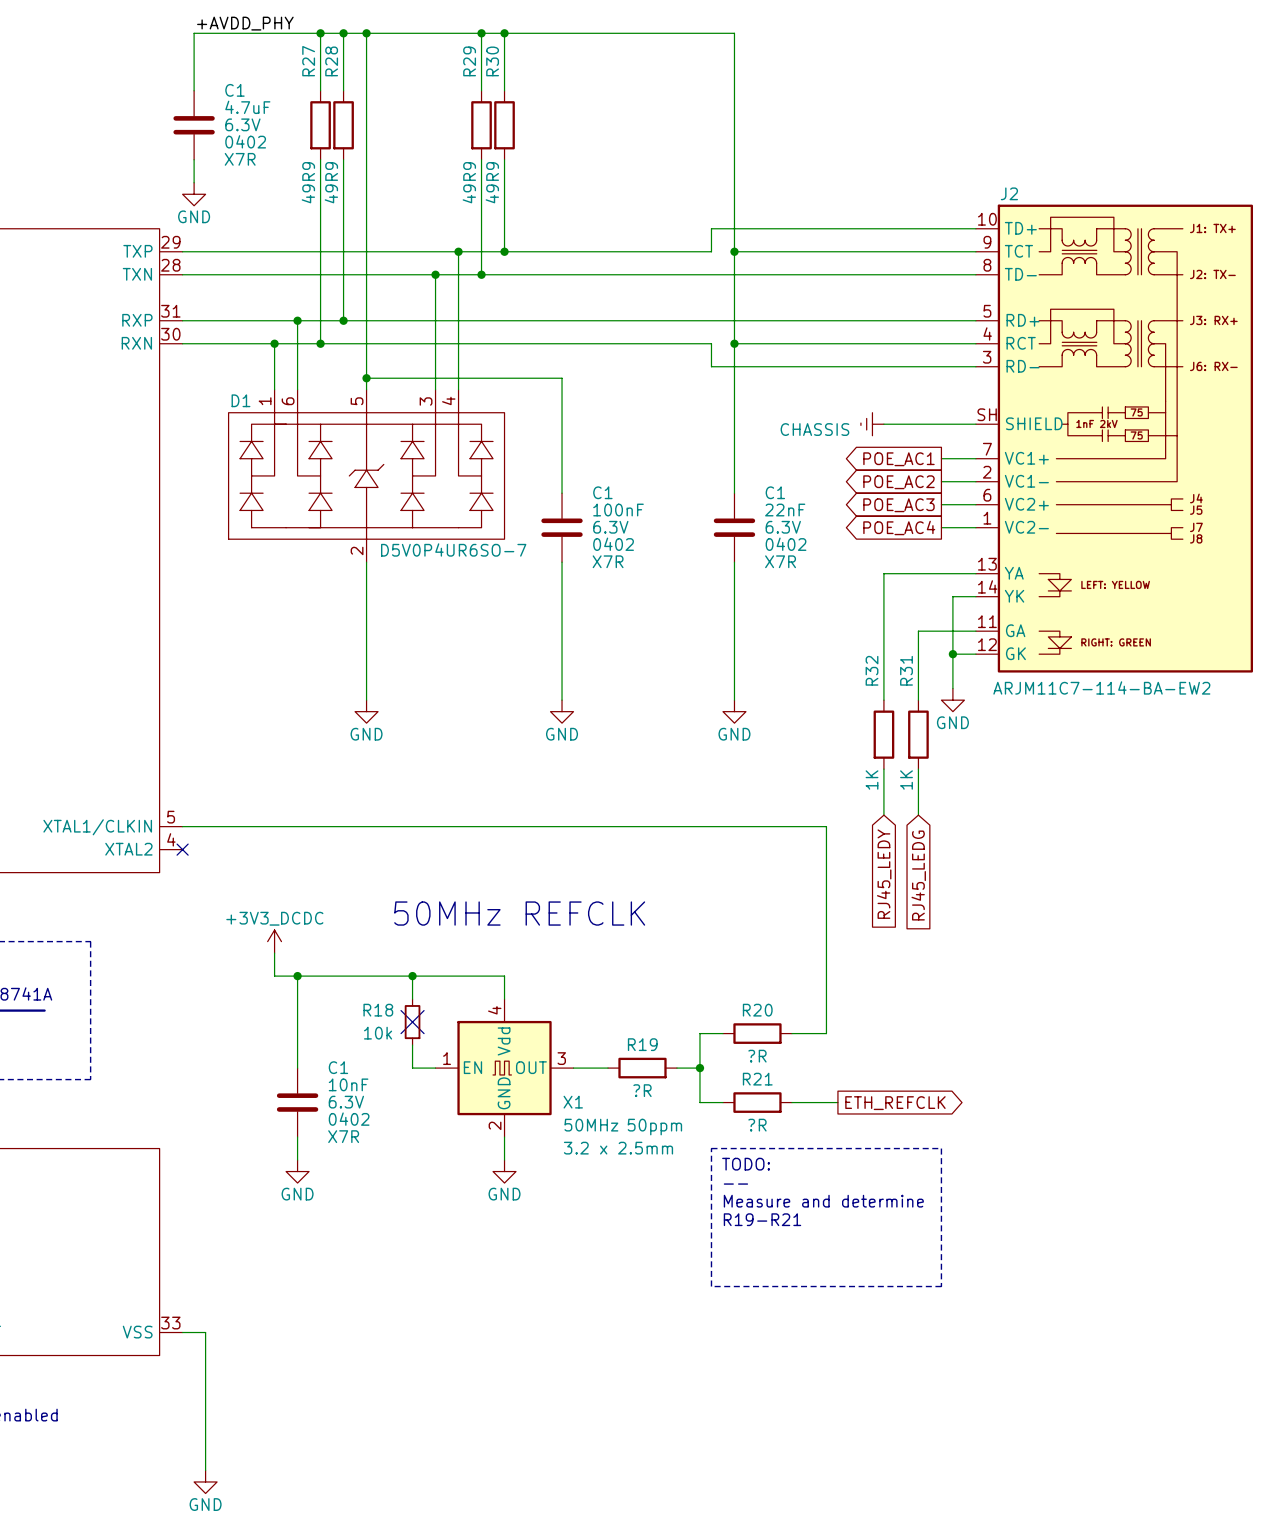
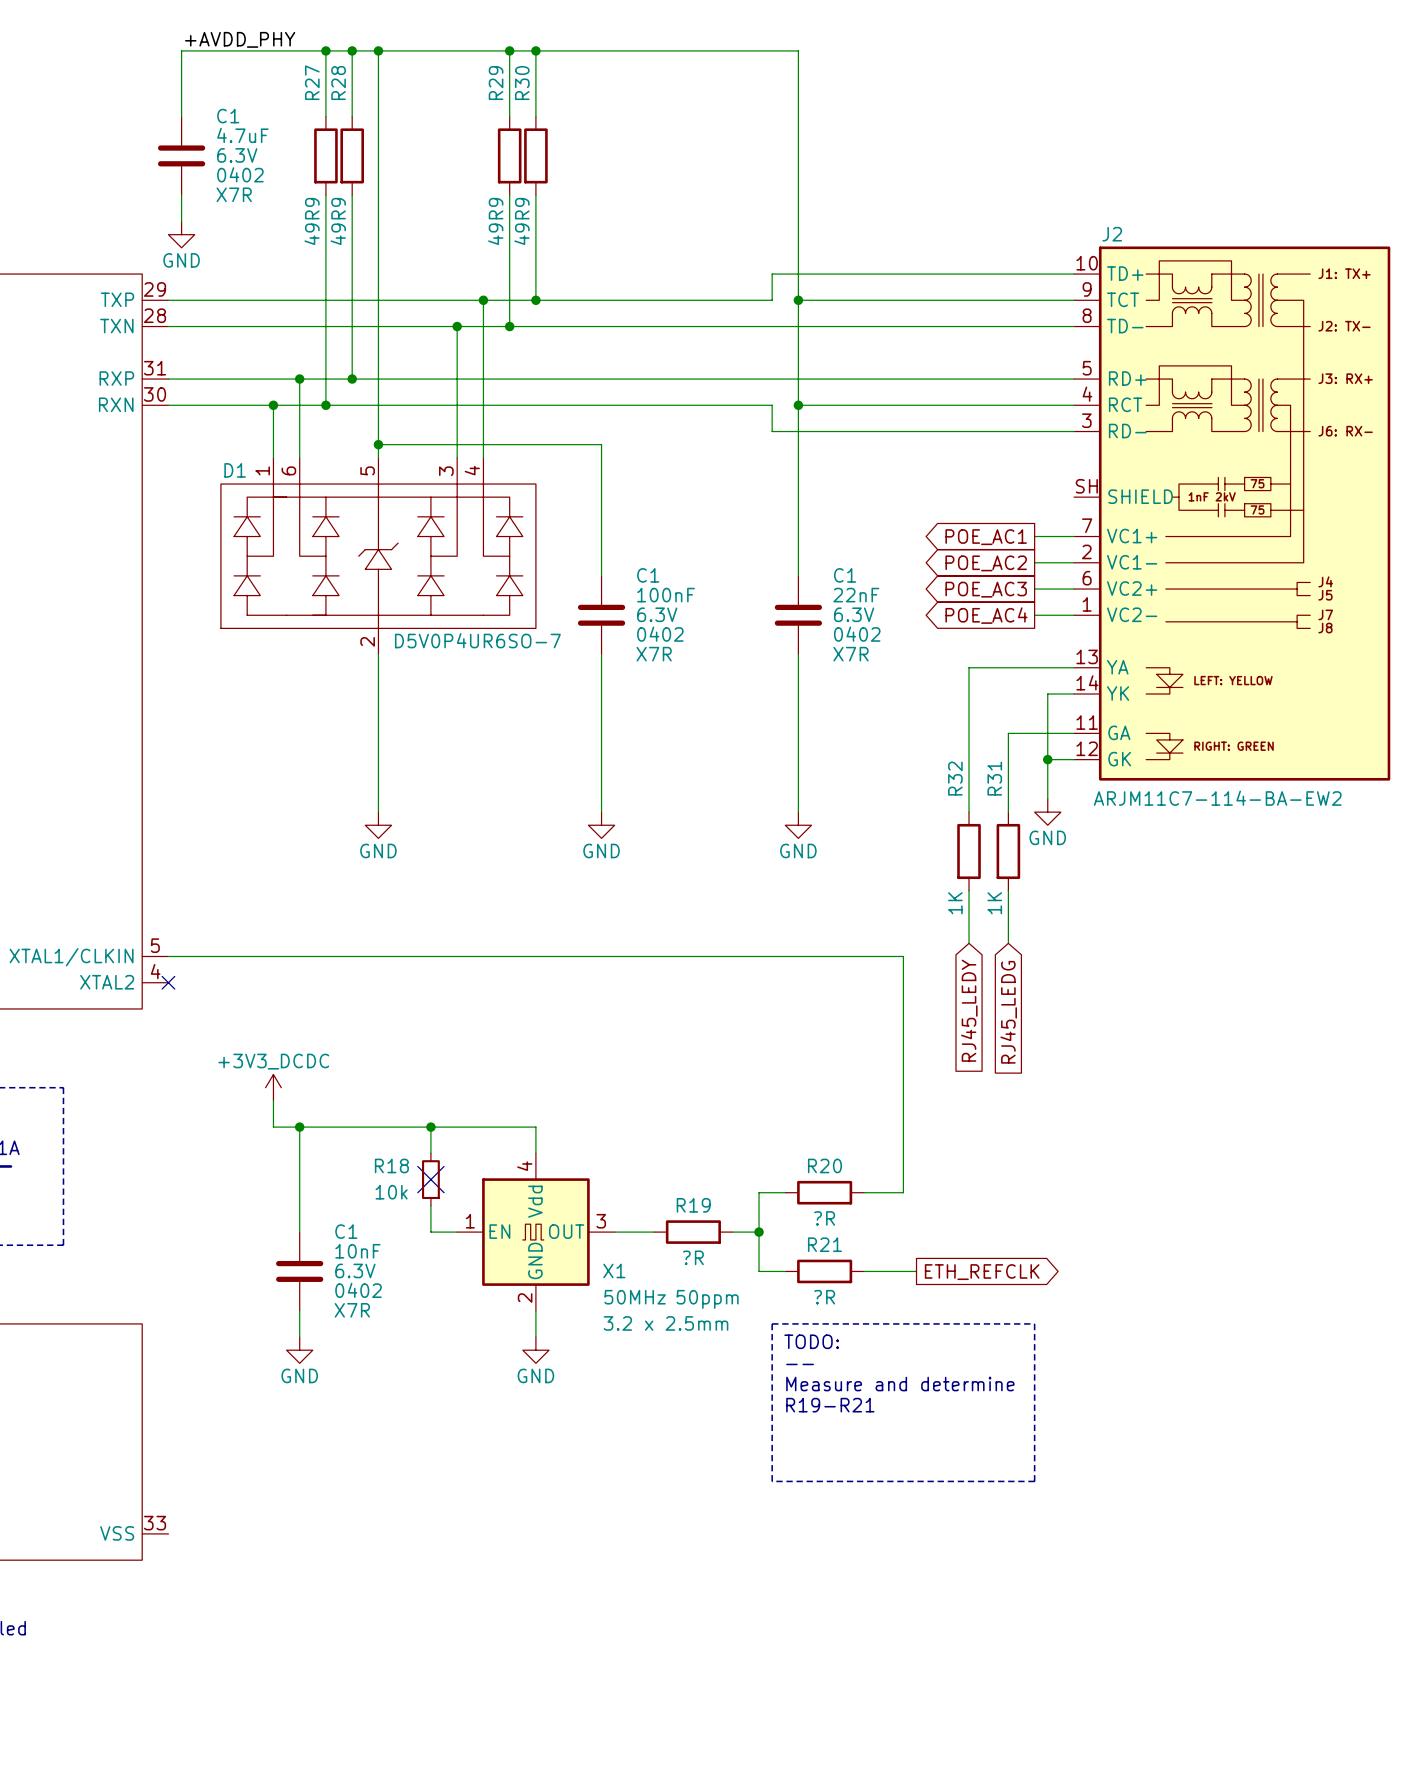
power symbol: CHASSIS (872, 424) -> none
wire: (883, 424) (975, 424) -> none
text: 50MHz REFCLK (519, 913) -> none
wire: (182, 1332) (205, 1332) (205, 1470) -> none
power symbol: GND (205, 1481) -> none

